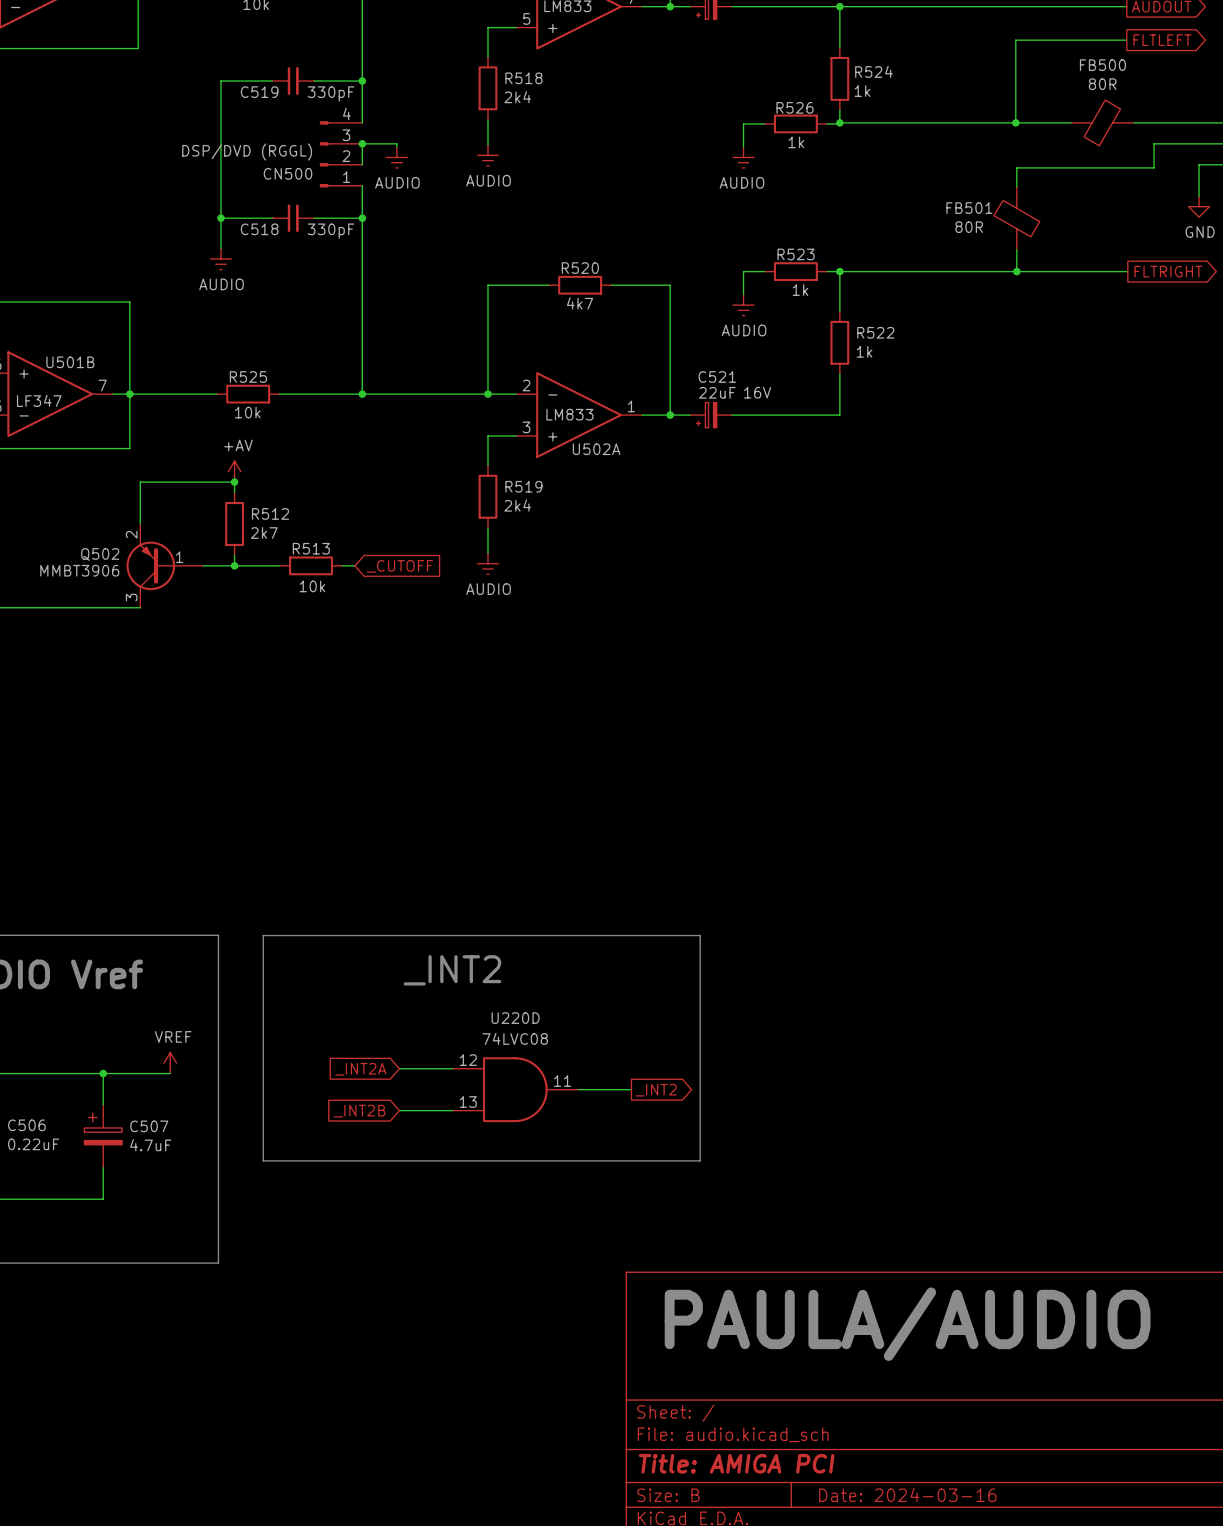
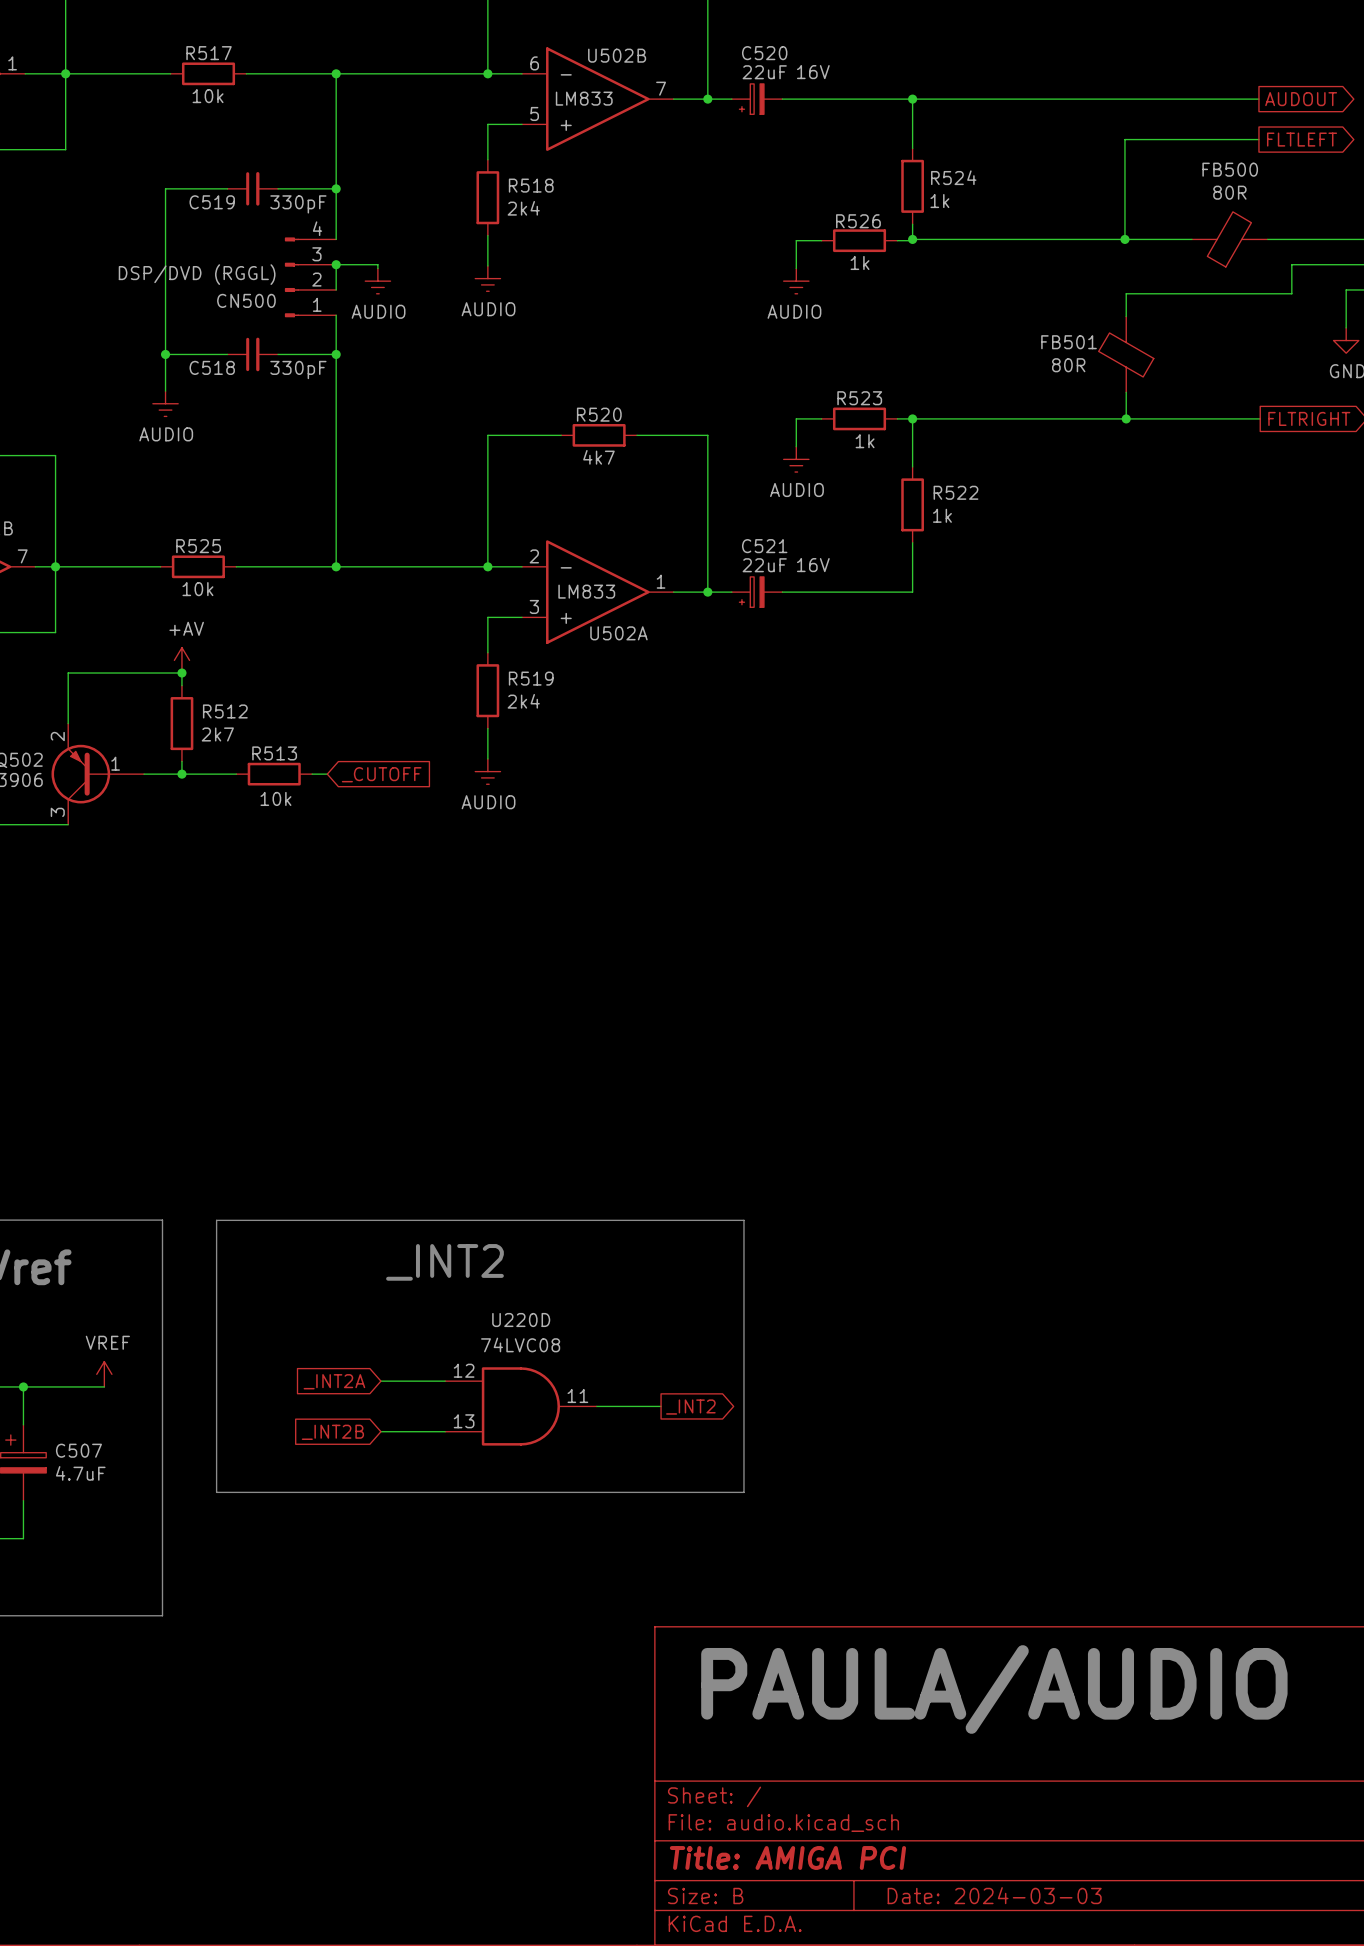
title block: Date: 2024-03-16 (907, 1494) -> Date: 2024-03-03 (994, 1895)

